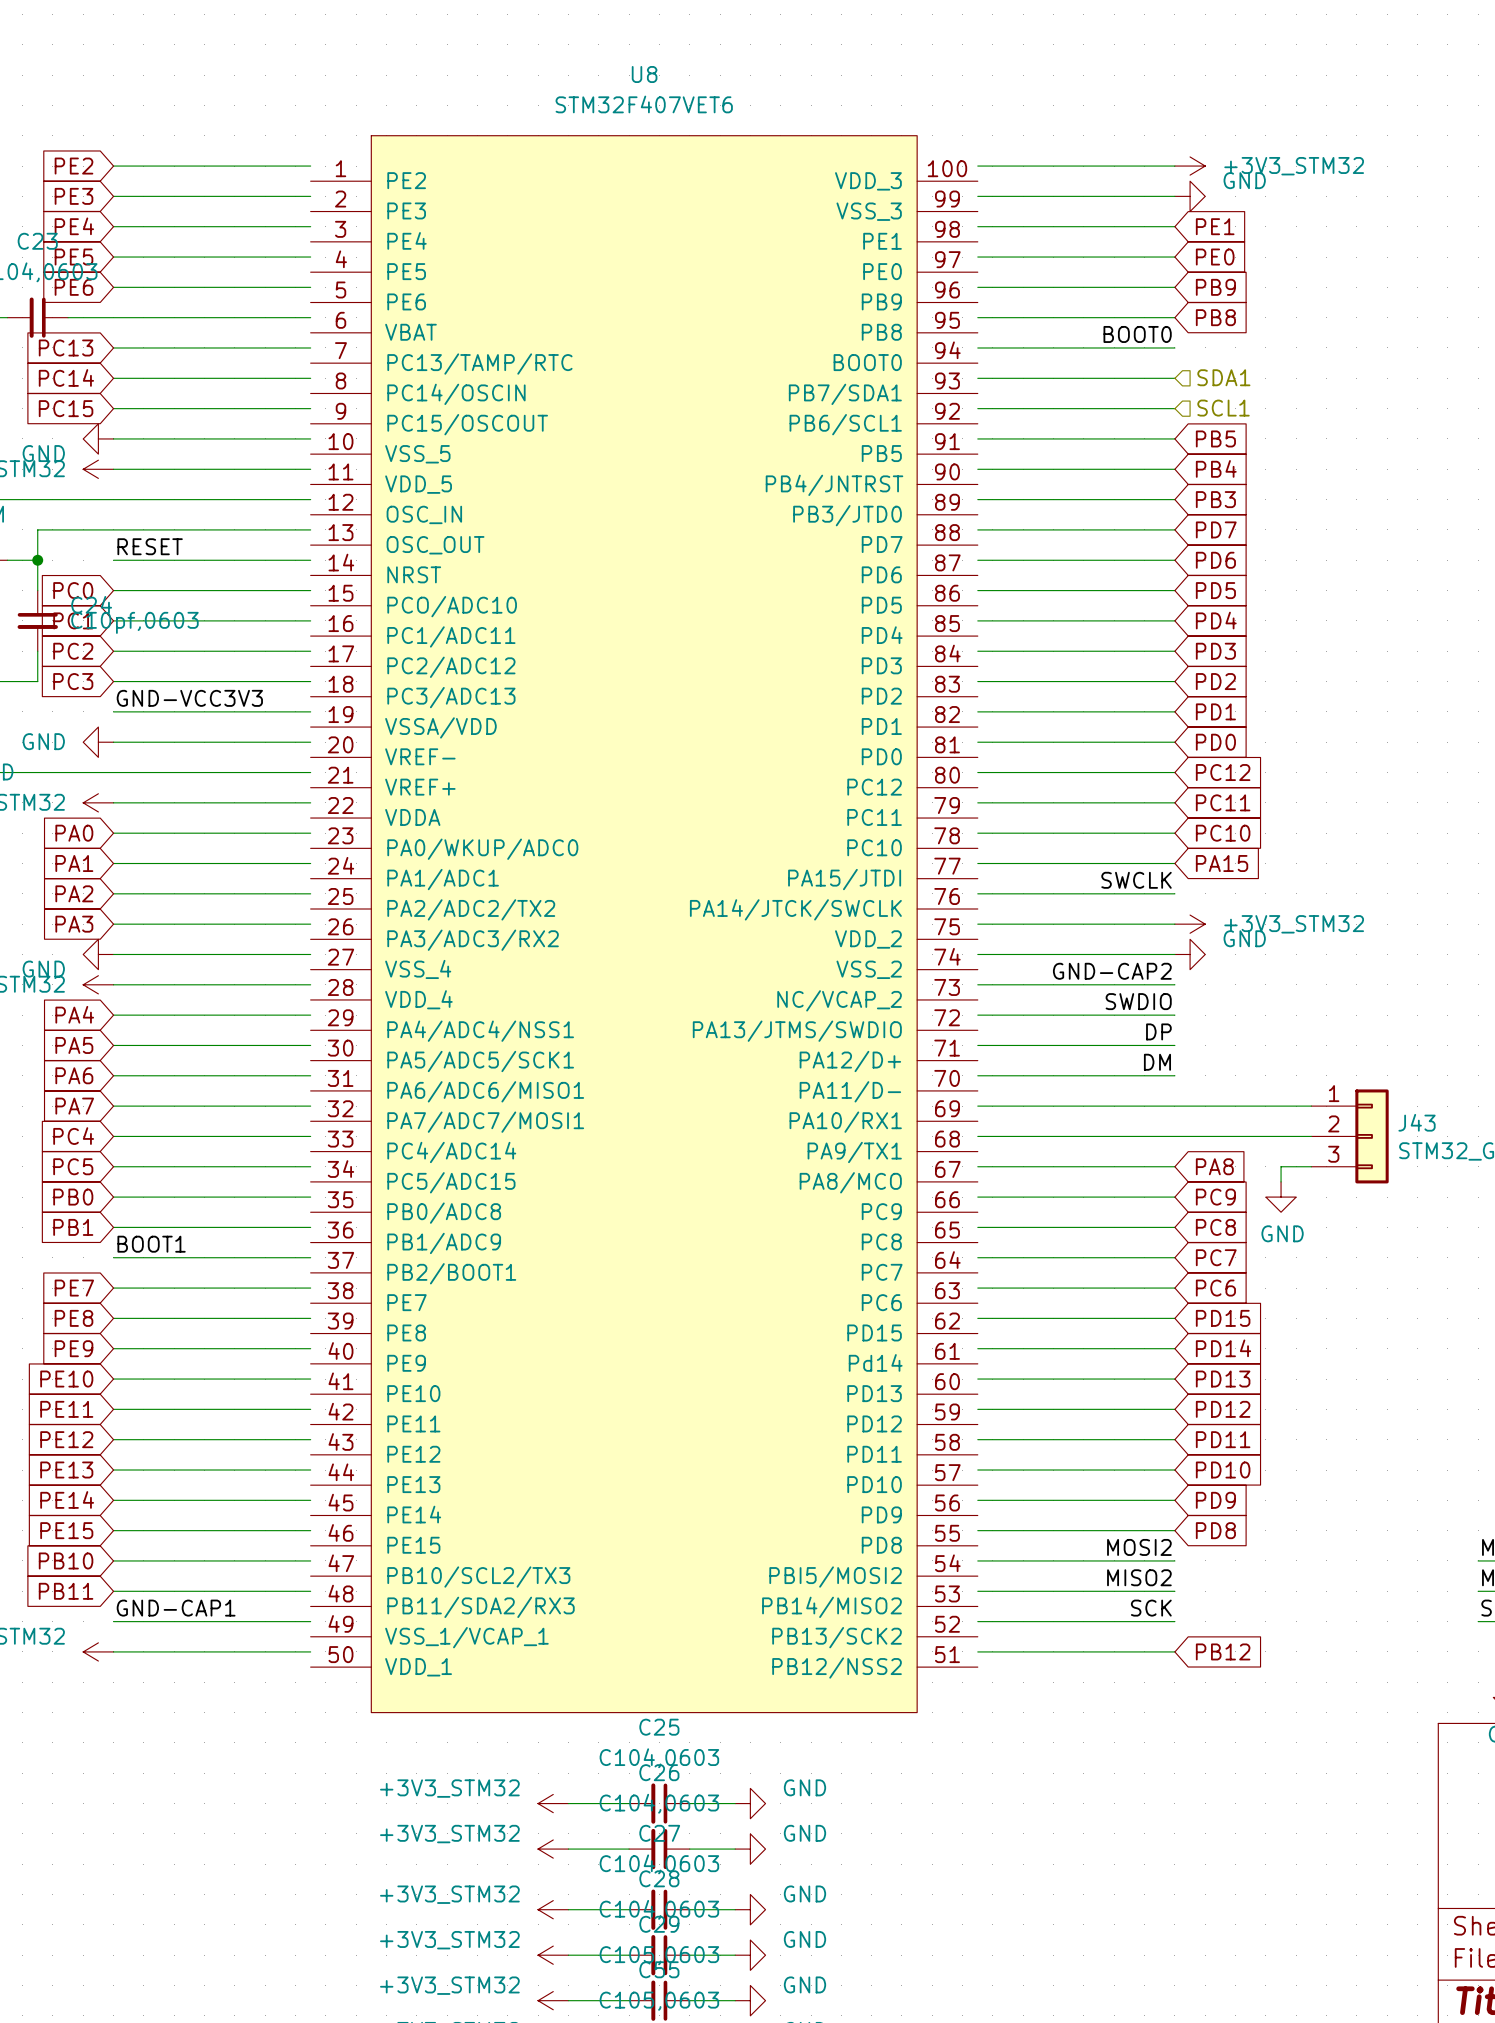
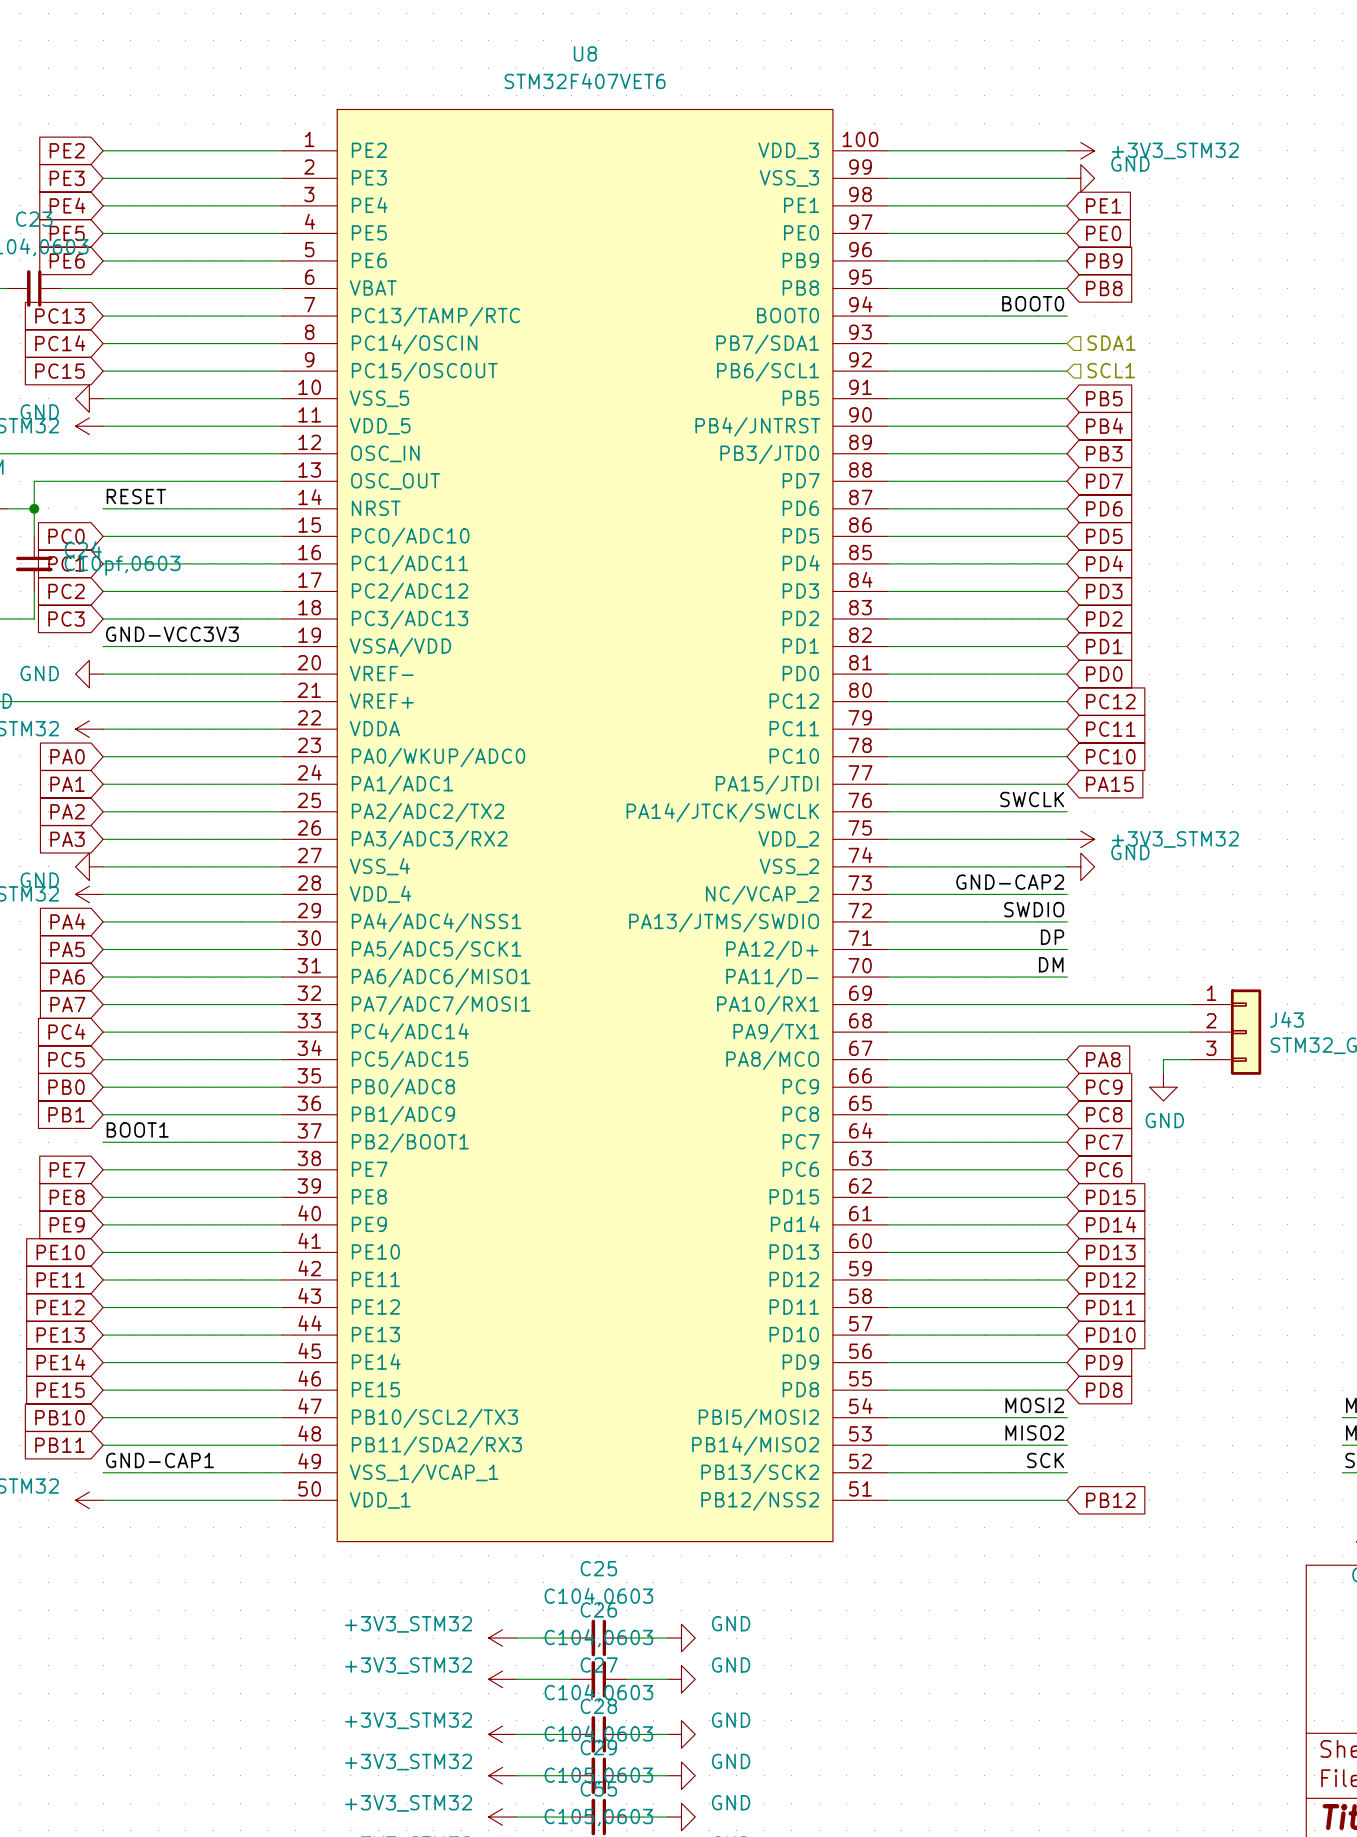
U8 position: (644, 924) -> (585, 825)

